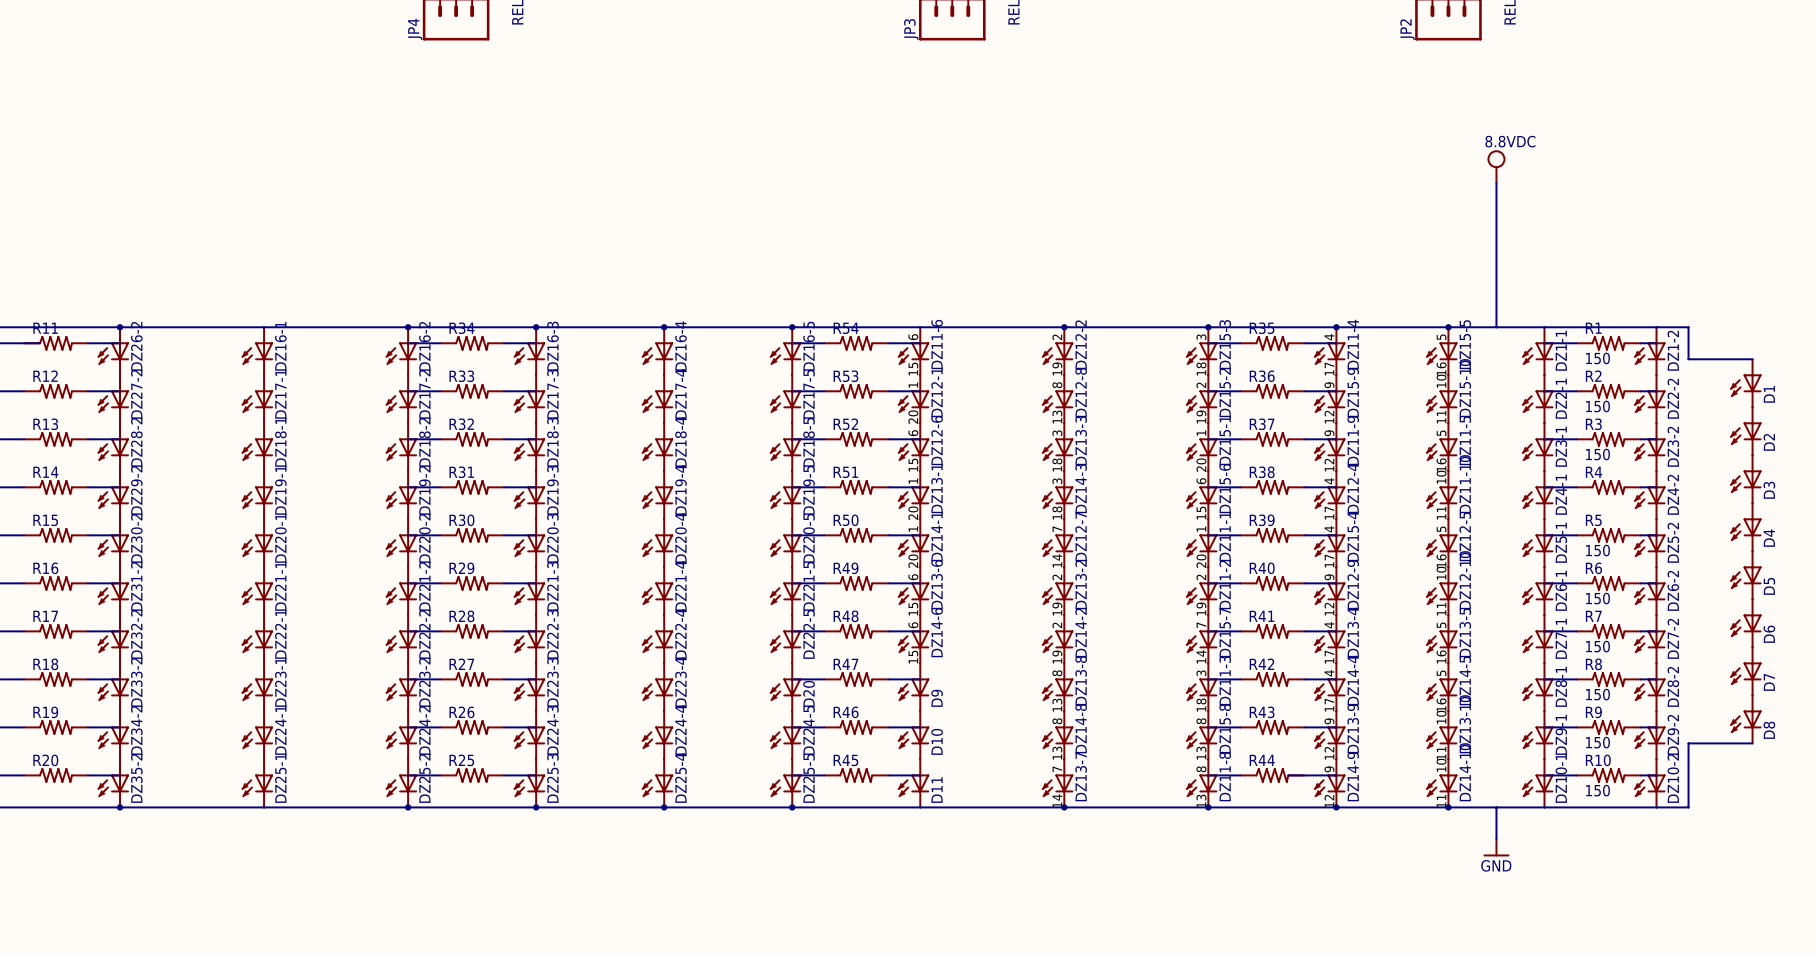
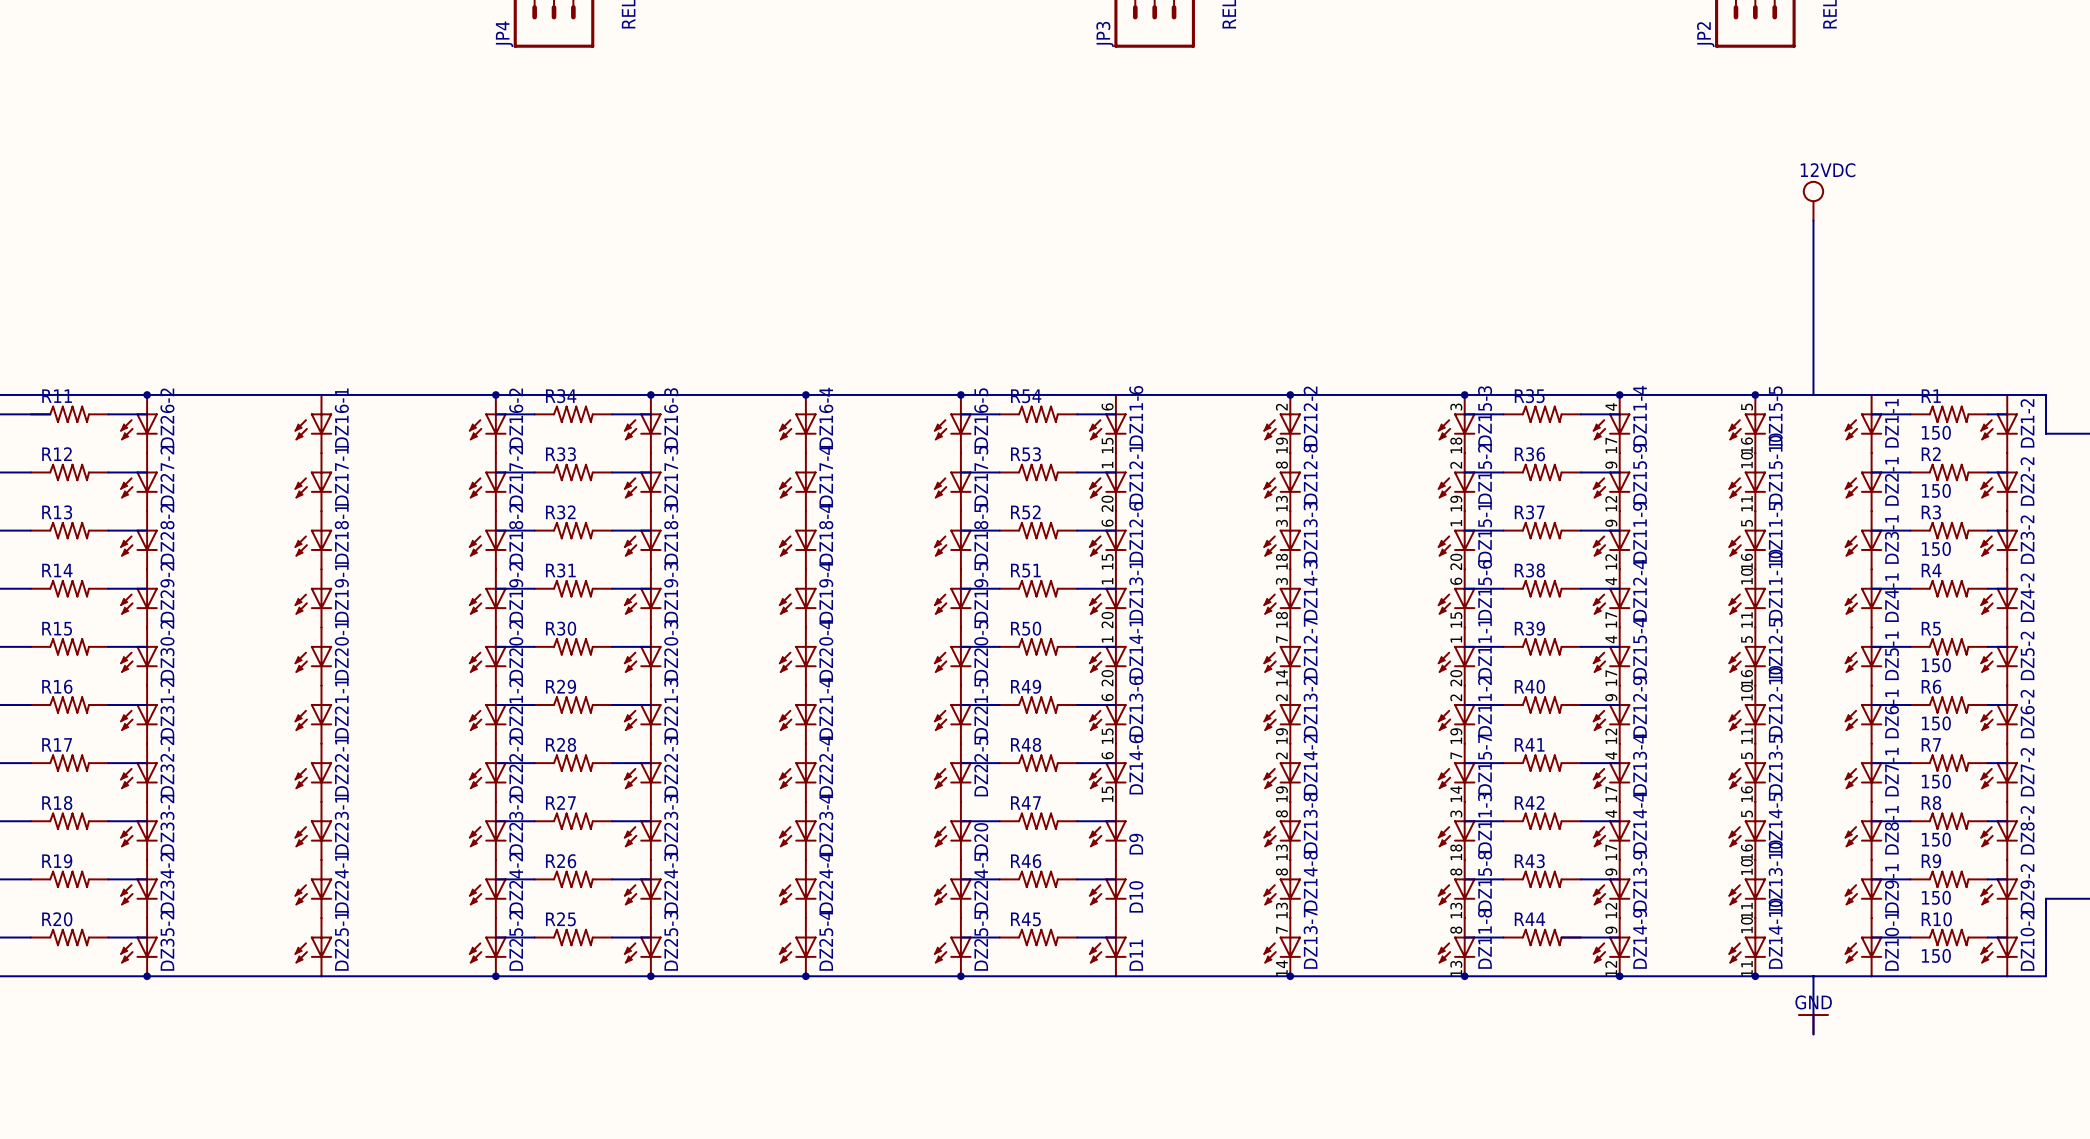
power symbol: 8.8VDC (1496, 166) -> 12VDC (1813, 200)
power symbol rotation: 0° (1496, 855) -> 180° (1813, 1015)

